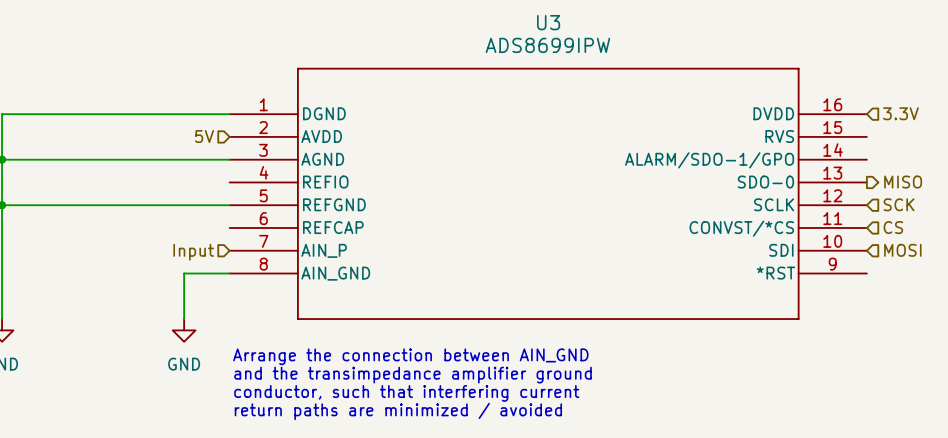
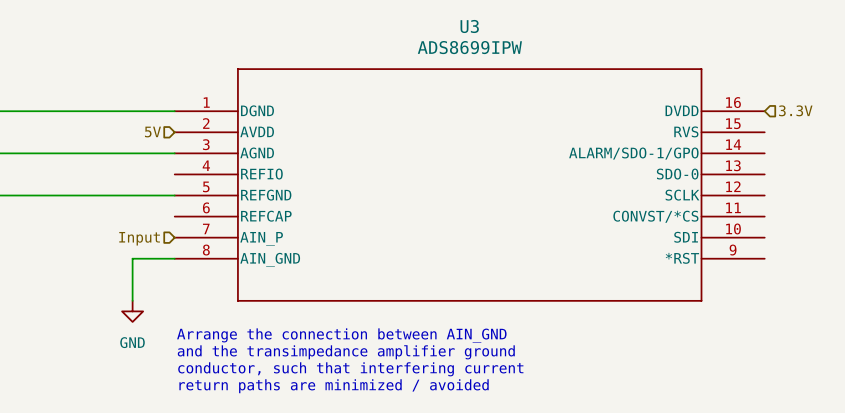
hierarchical label: MISO (903, 182) -> none
hierarchical label: SCK (899, 204) -> none
hierarchical label: CS (893, 227) -> none
hierarchical label: MOSI (902, 250) -> none

